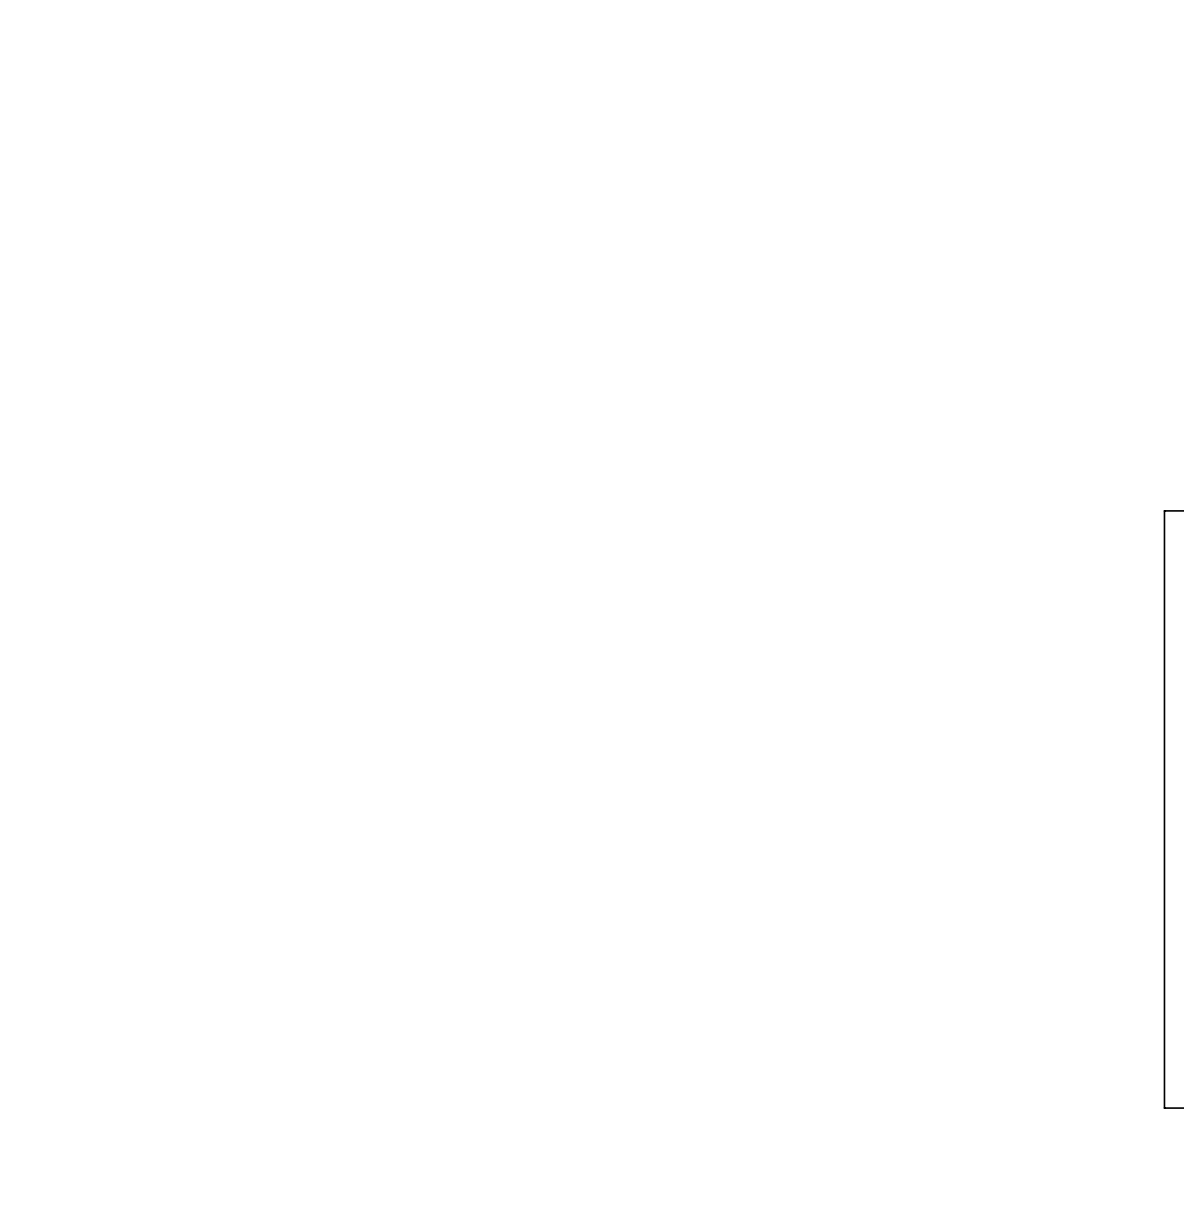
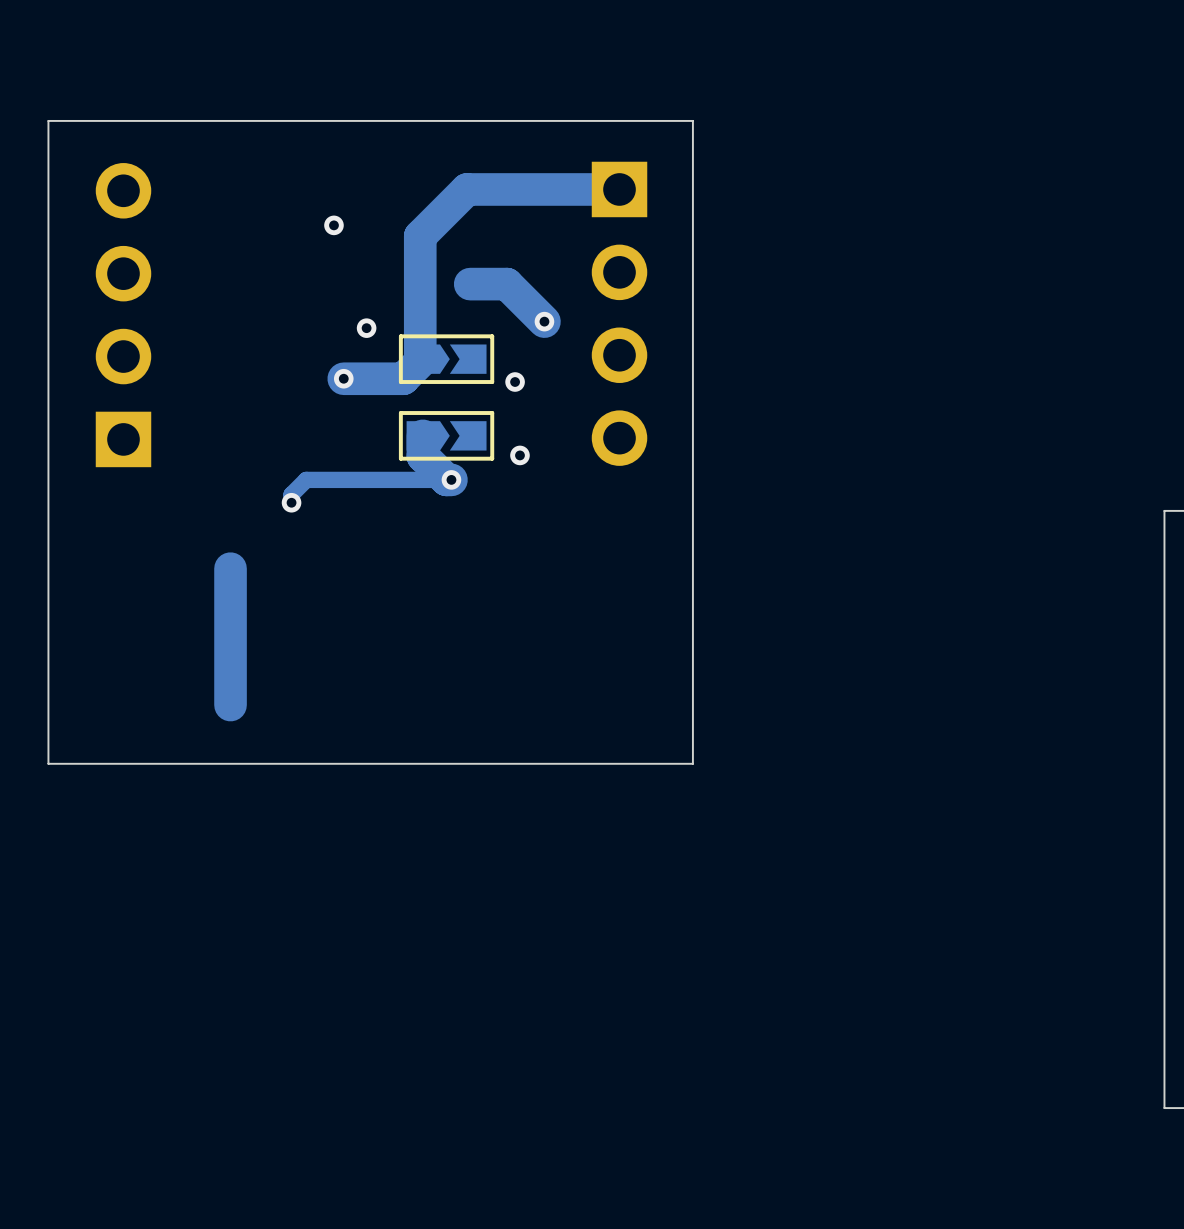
board edge: none -> (692, 120) (48, 120) (48, 763) (692, 763) (692, 120)
track: none -> (619, 189) (467, 189) (420, 236) (420, 356) (422, 359) (403, 378) (343, 378)
via: none -> (333, 225)
track: none -> (470, 284) (506, 284) (544, 321)
part: none -> (619, 313)
part: none -> (123, 315)
via: none -> (544, 321)
via: none -> (366, 328)
part: none -> (446, 359)
via: none -> (343, 378)
via: none -> (515, 382)
track: none -> (422, 435) (422, 456) (446, 479) (451, 479) (306, 479) (291, 494) (291, 502)
part: none -> (446, 435)
via: none -> (519, 455)
via: none -> (451, 479)
via: none -> (291, 502)
track: none -> (230, 568) (230, 705)

